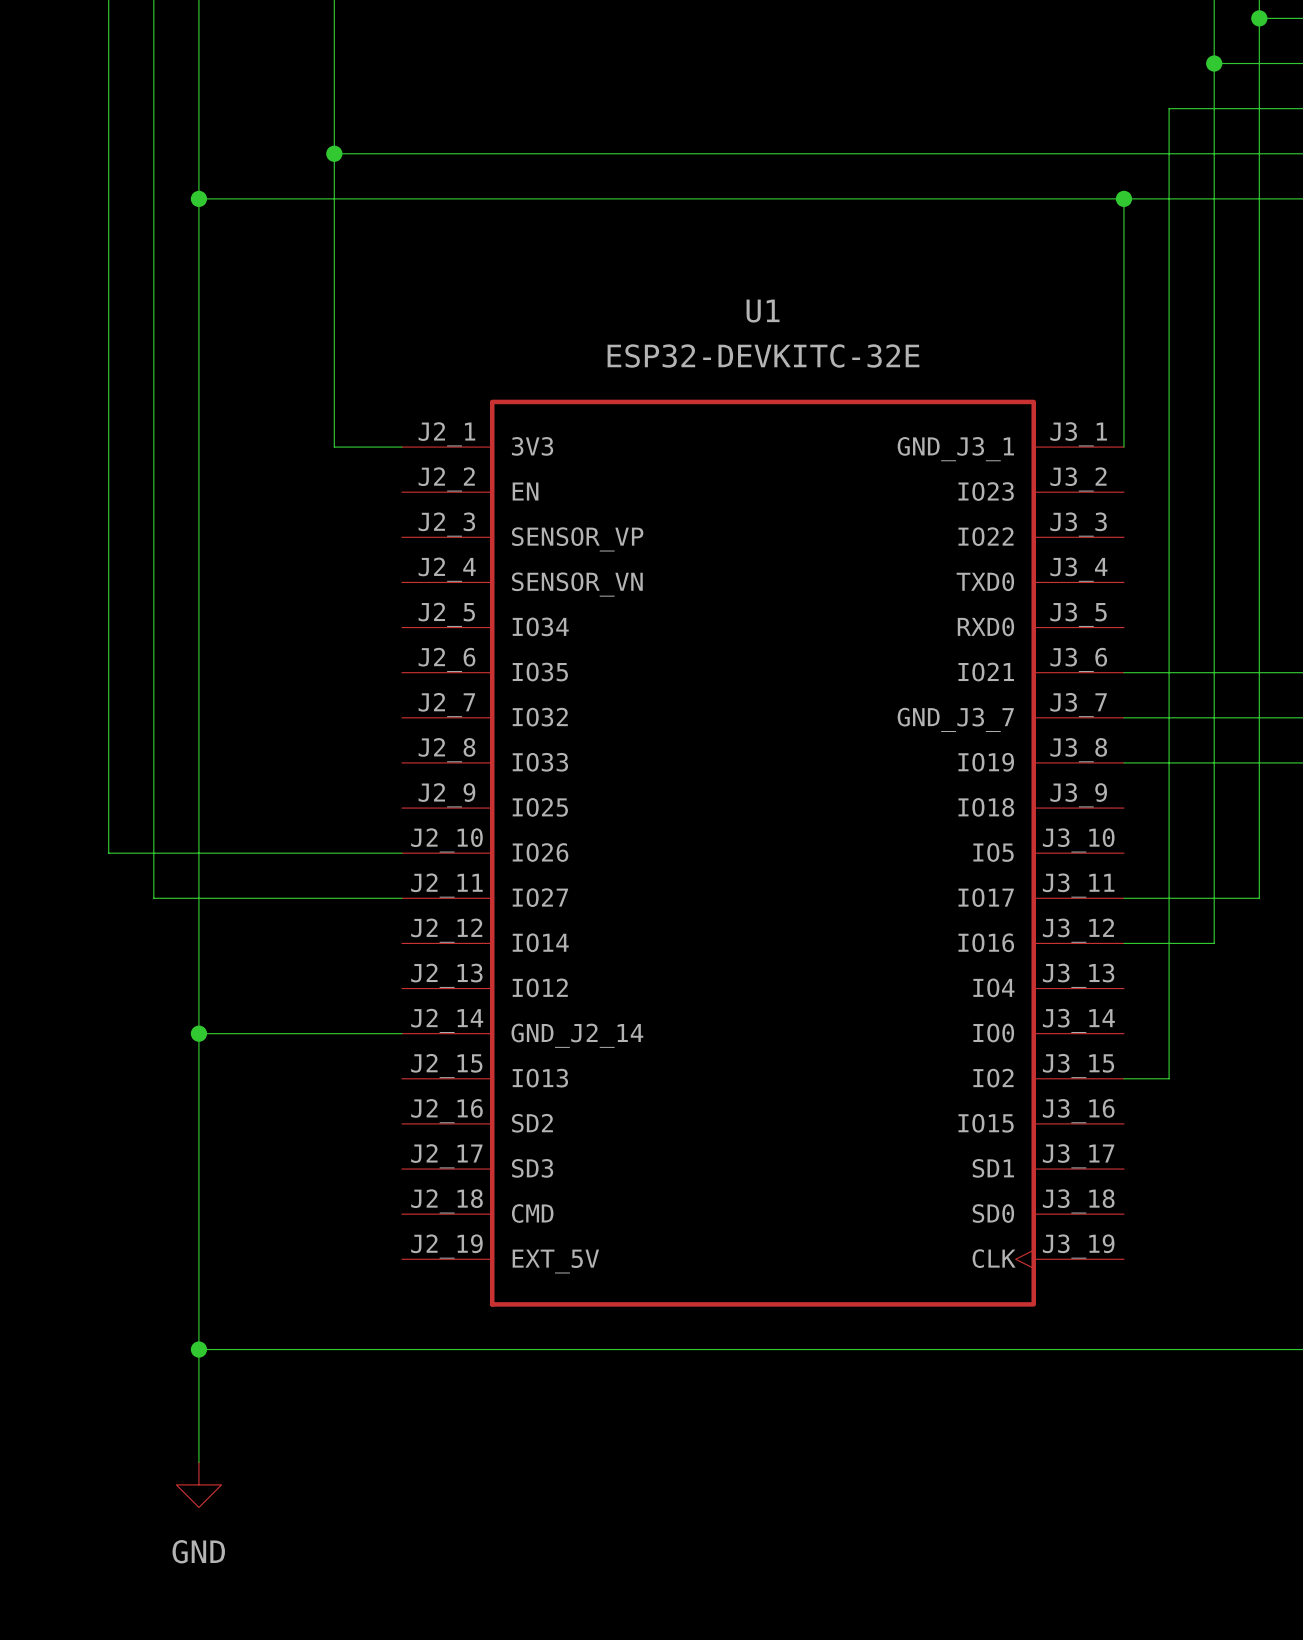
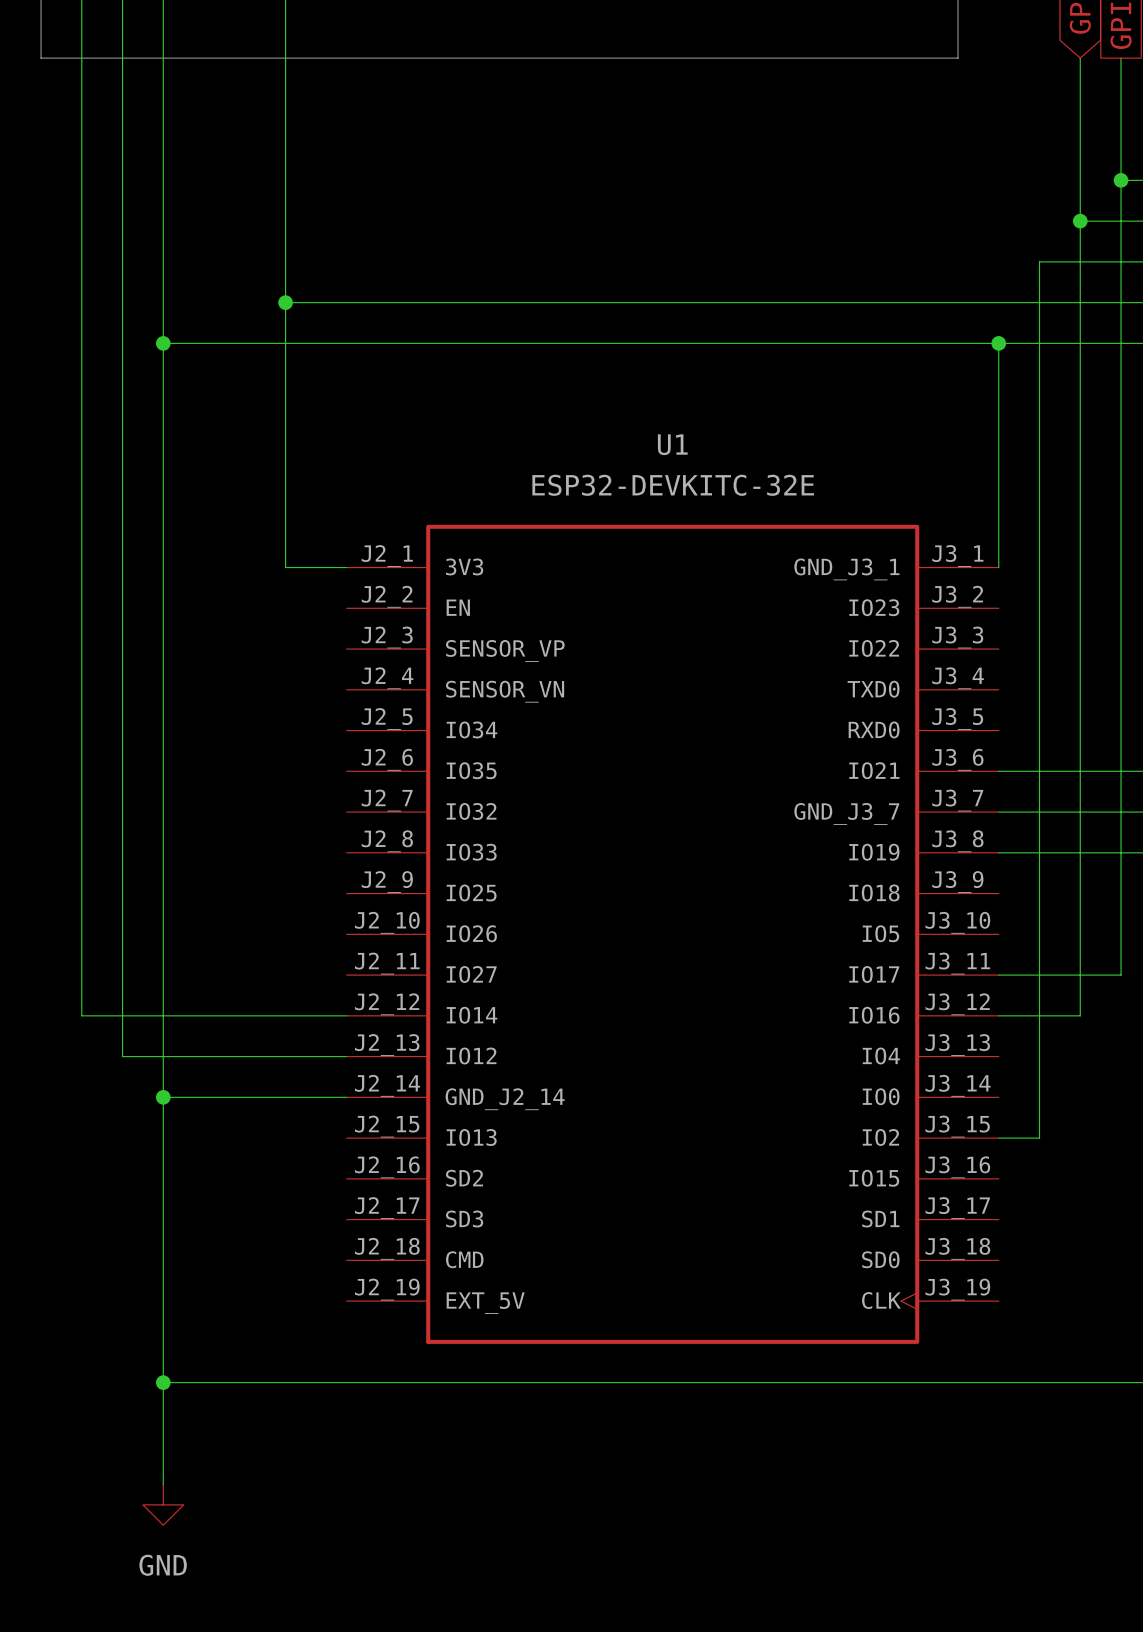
wire: (108, 853) (401, 853) -> (81, 934) (81, 1015) (346, 1015)
wire: (153, 898) (401, 898) -> (122, 975) (122, 1056) (346, 1056)

